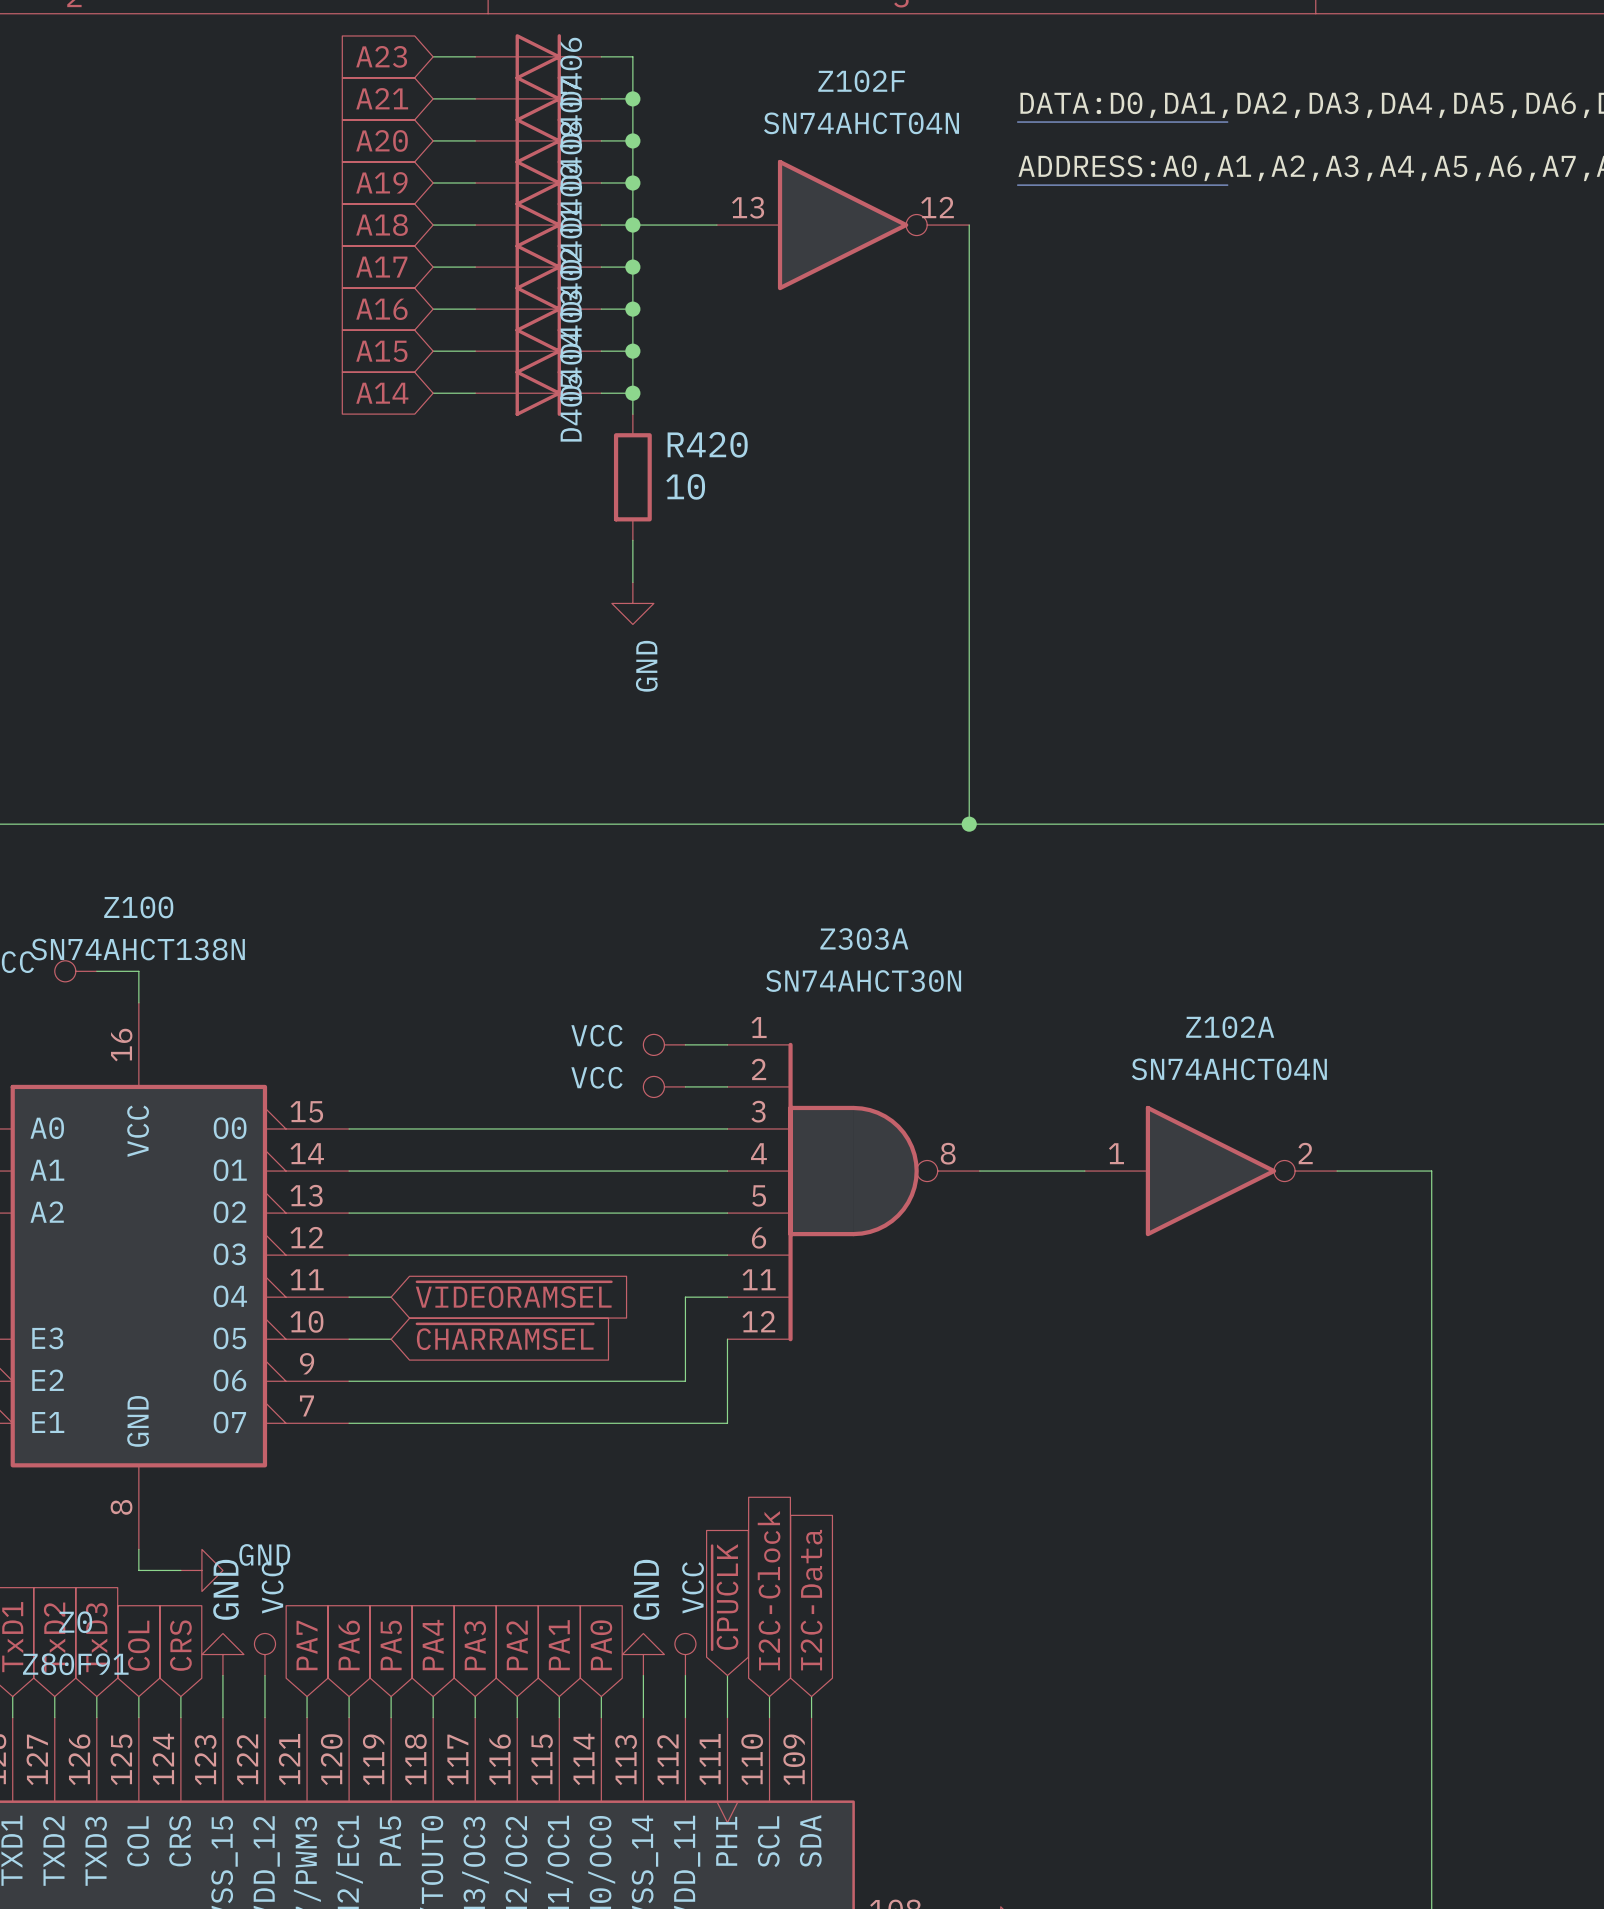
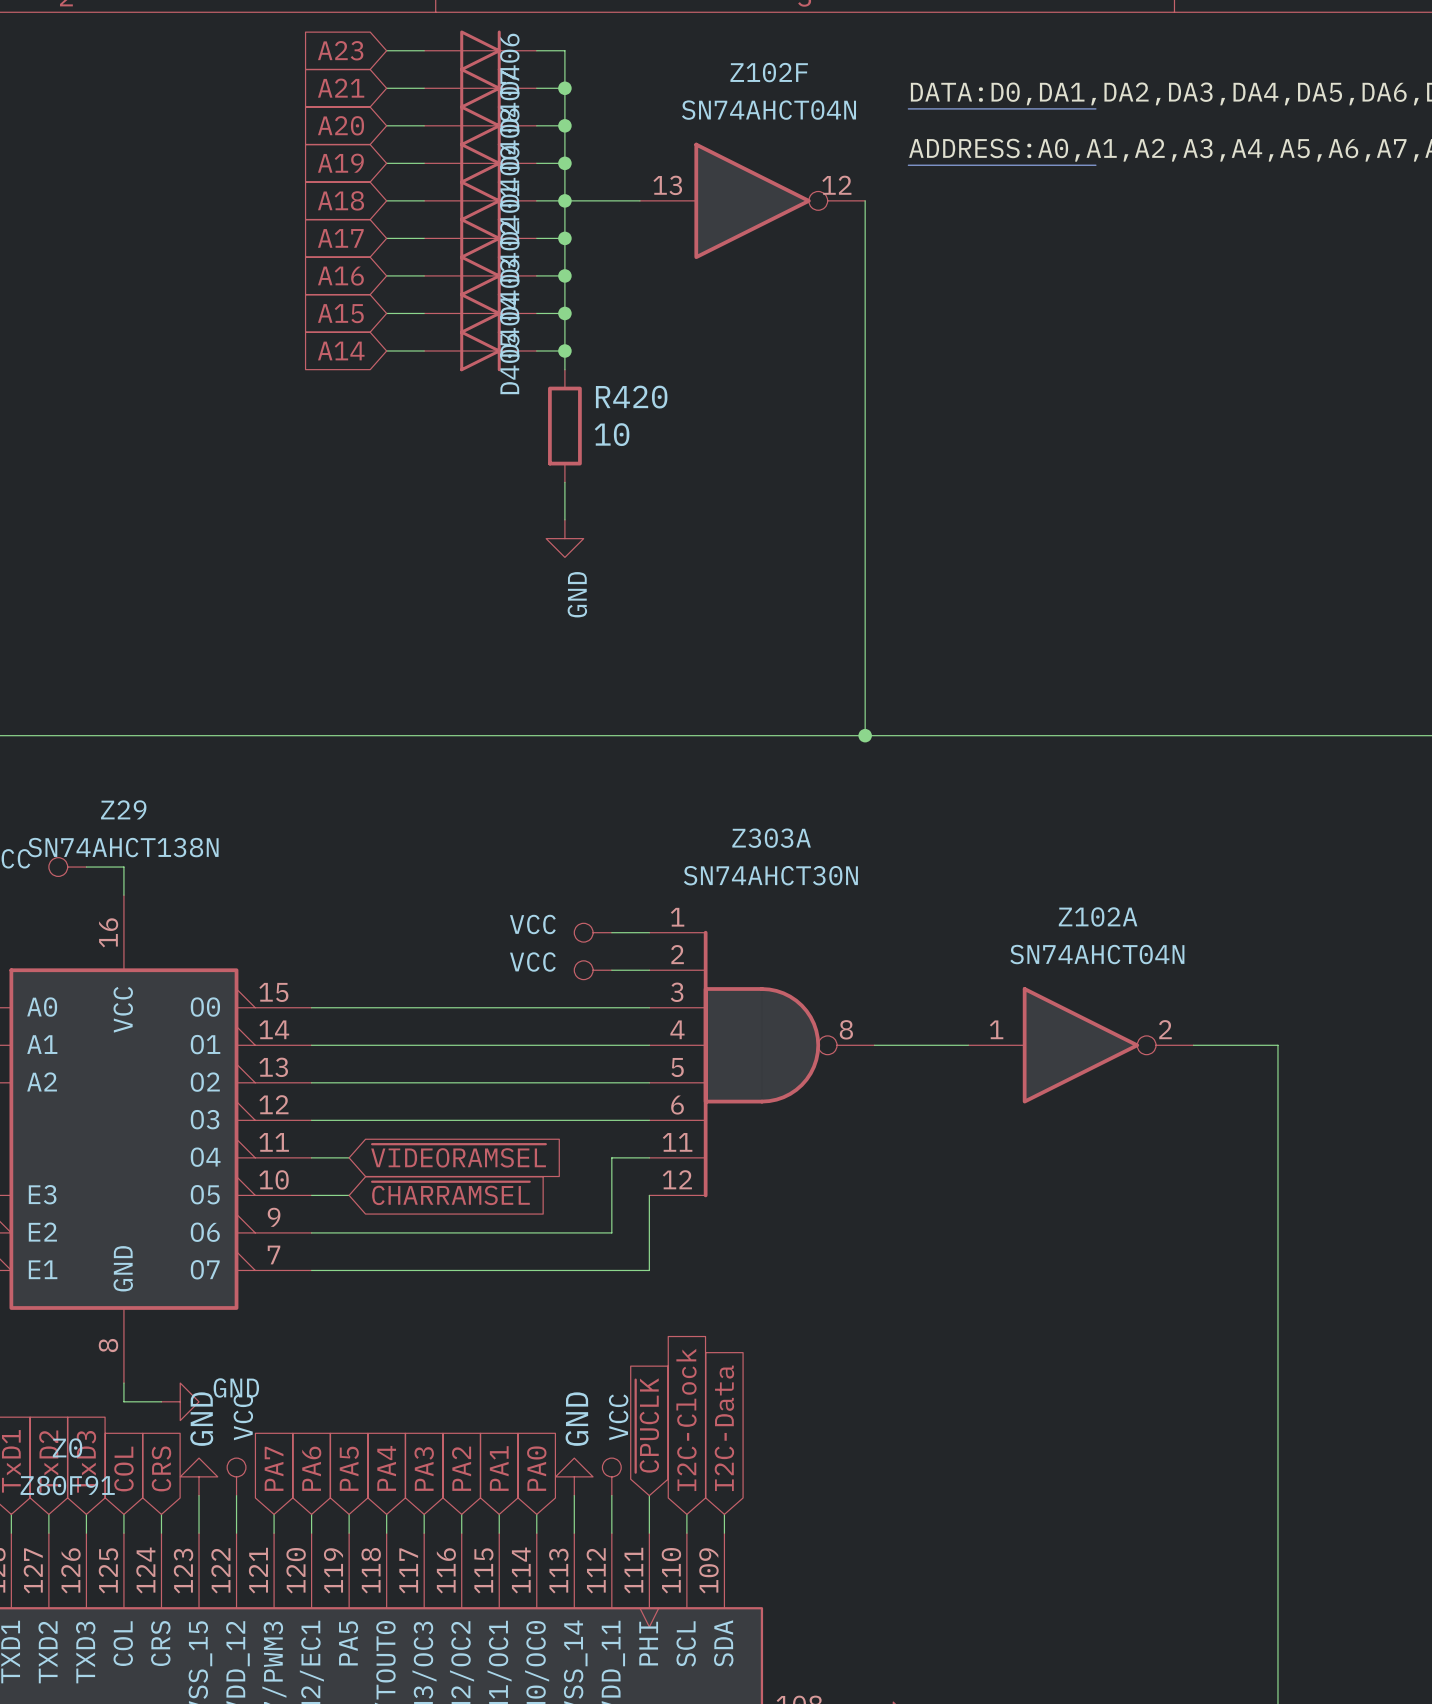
Z100 name: Z100 (138, 907) -> Z29 (123, 809)

